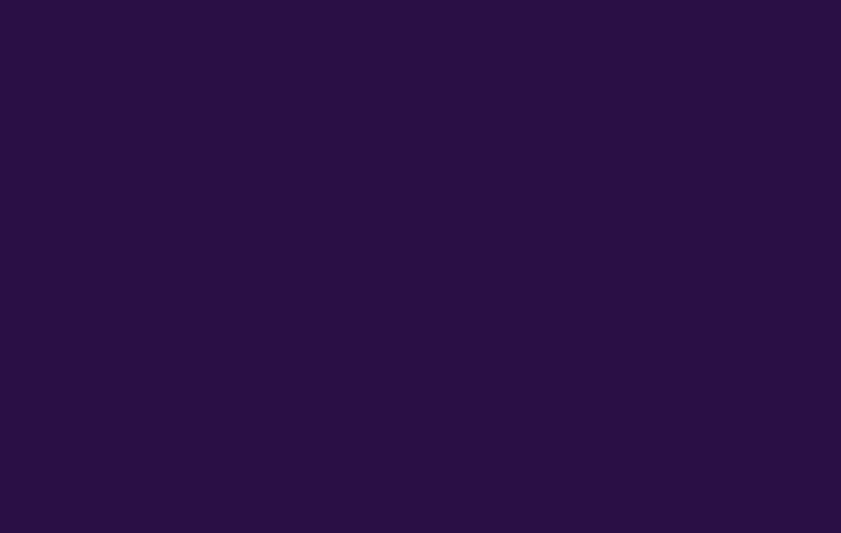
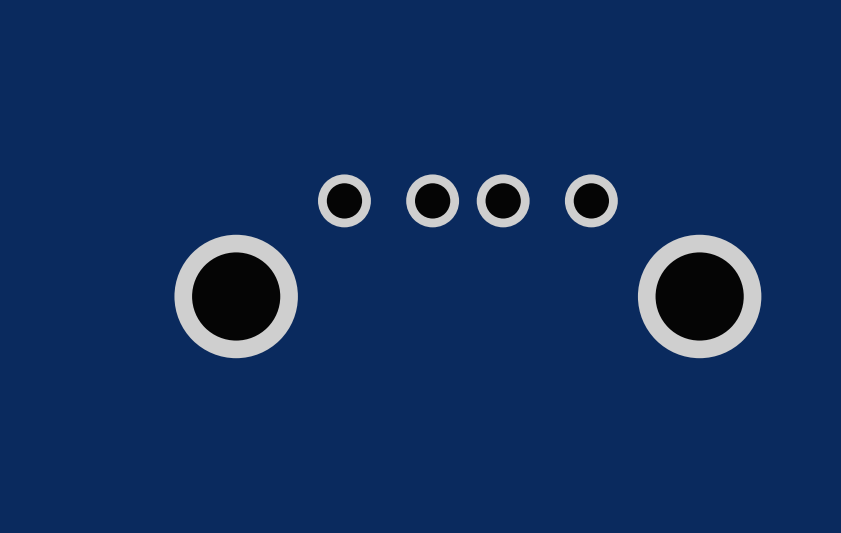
part: none -> (467, 266)

